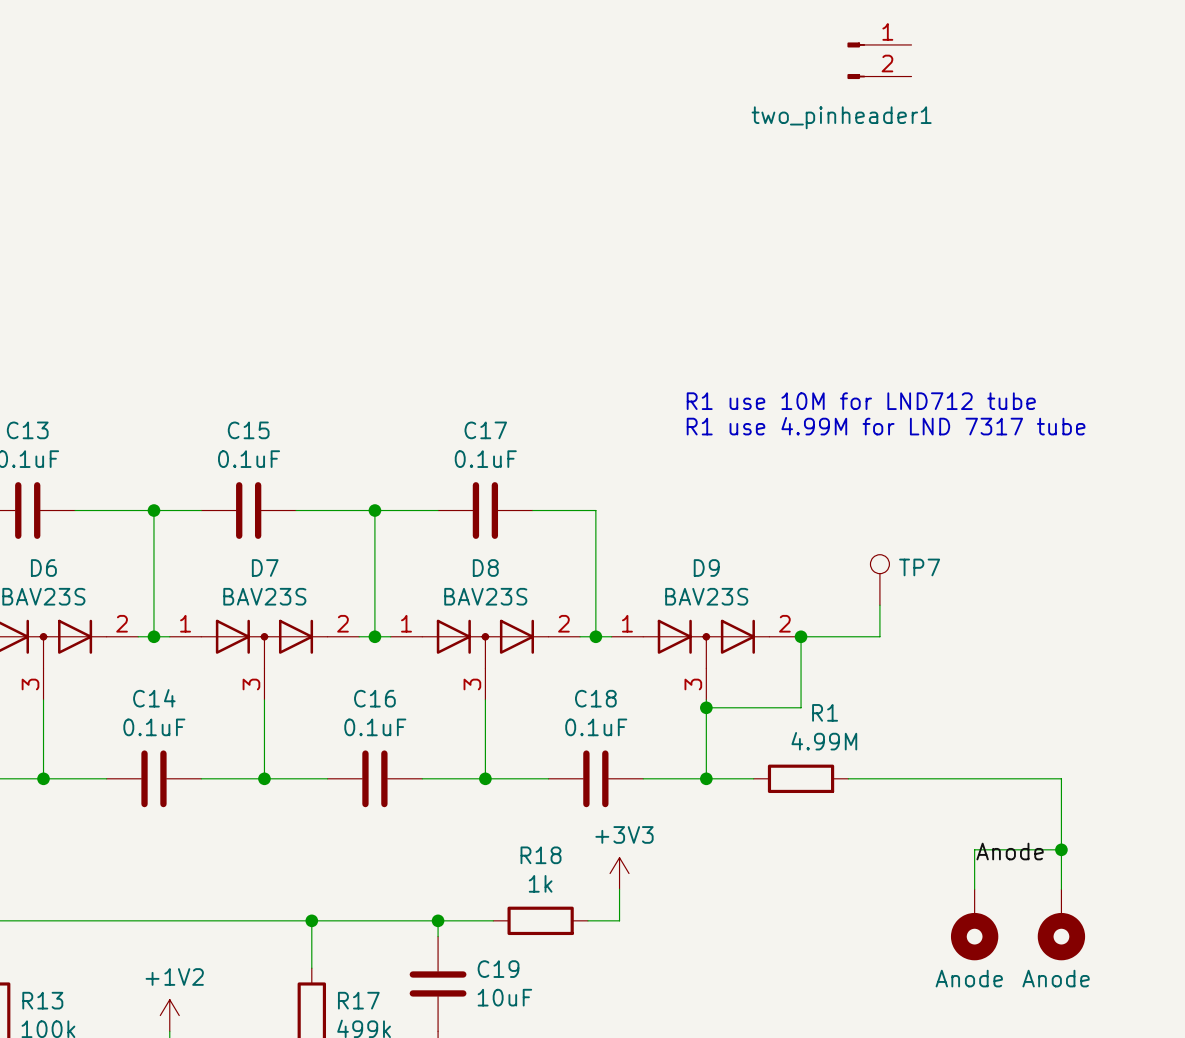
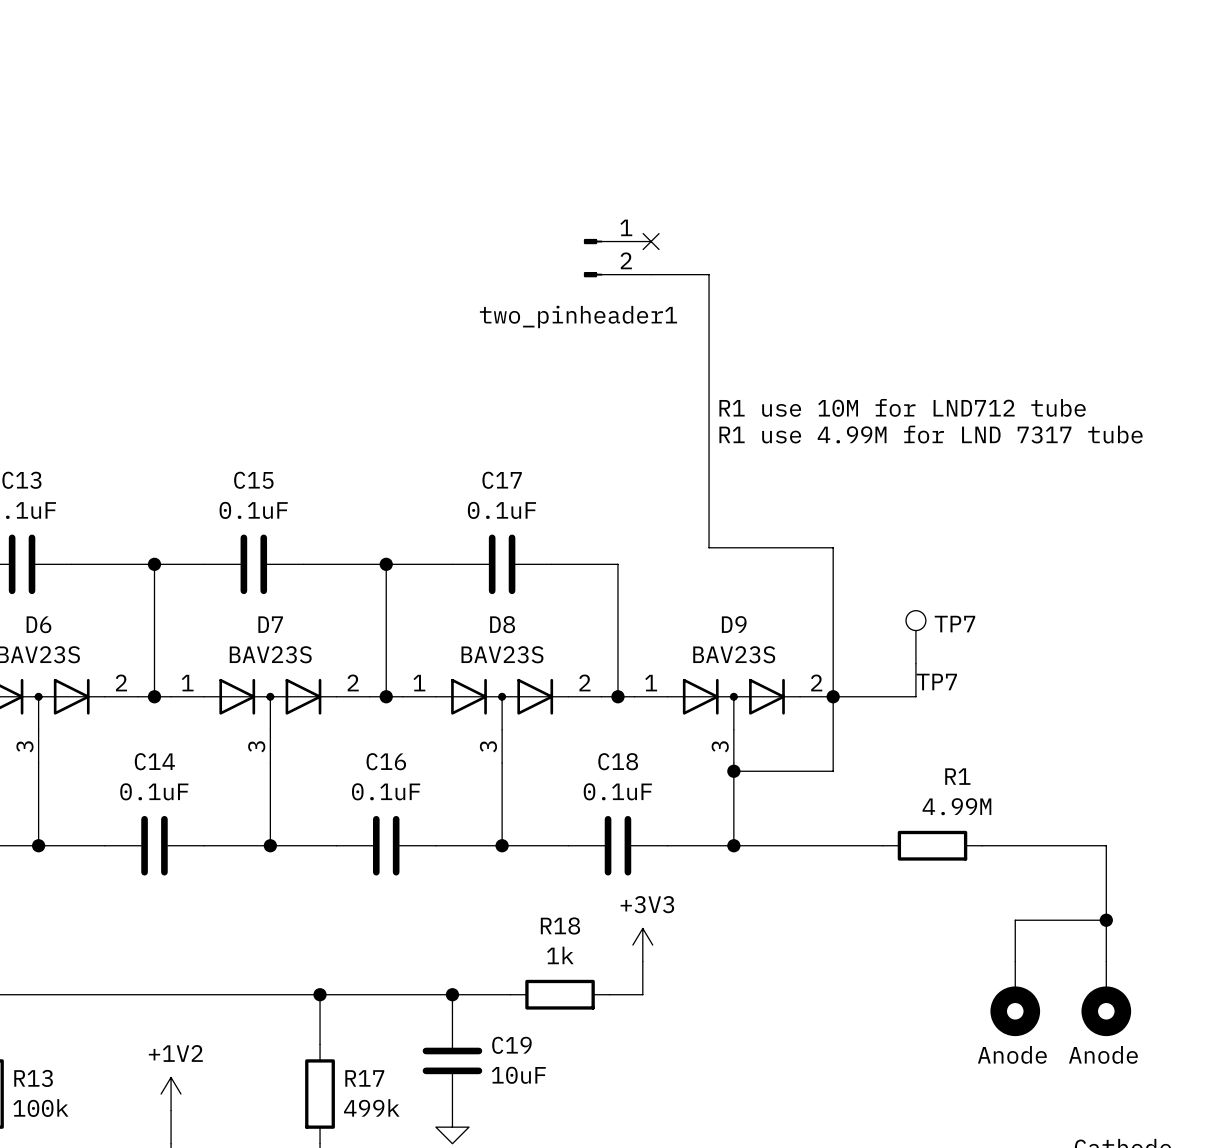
two_pinheader1 position: (879, 60) -> (617, 258)
no-connect mark: none -> (651, 241)
wire: none -> (651, 274) (709, 274) (709, 547) (833, 547) (833, 696)
text position: R1 use 10M for LND712 tube (861, 401) -> R1 use 10M for LND712 tube (902, 407)
text position: R1 use 4.99M for LND 7317 tube (886, 426) -> R1 use 4.99M for LND 7317 tube (931, 434)
label: none -> TP7 (936, 681)
R1 position: (801, 778) -> (932, 845)
wire: (848, 778) (943, 778) -> (882, 845) (783, 845)
label: Anode (1010, 851) -> none

